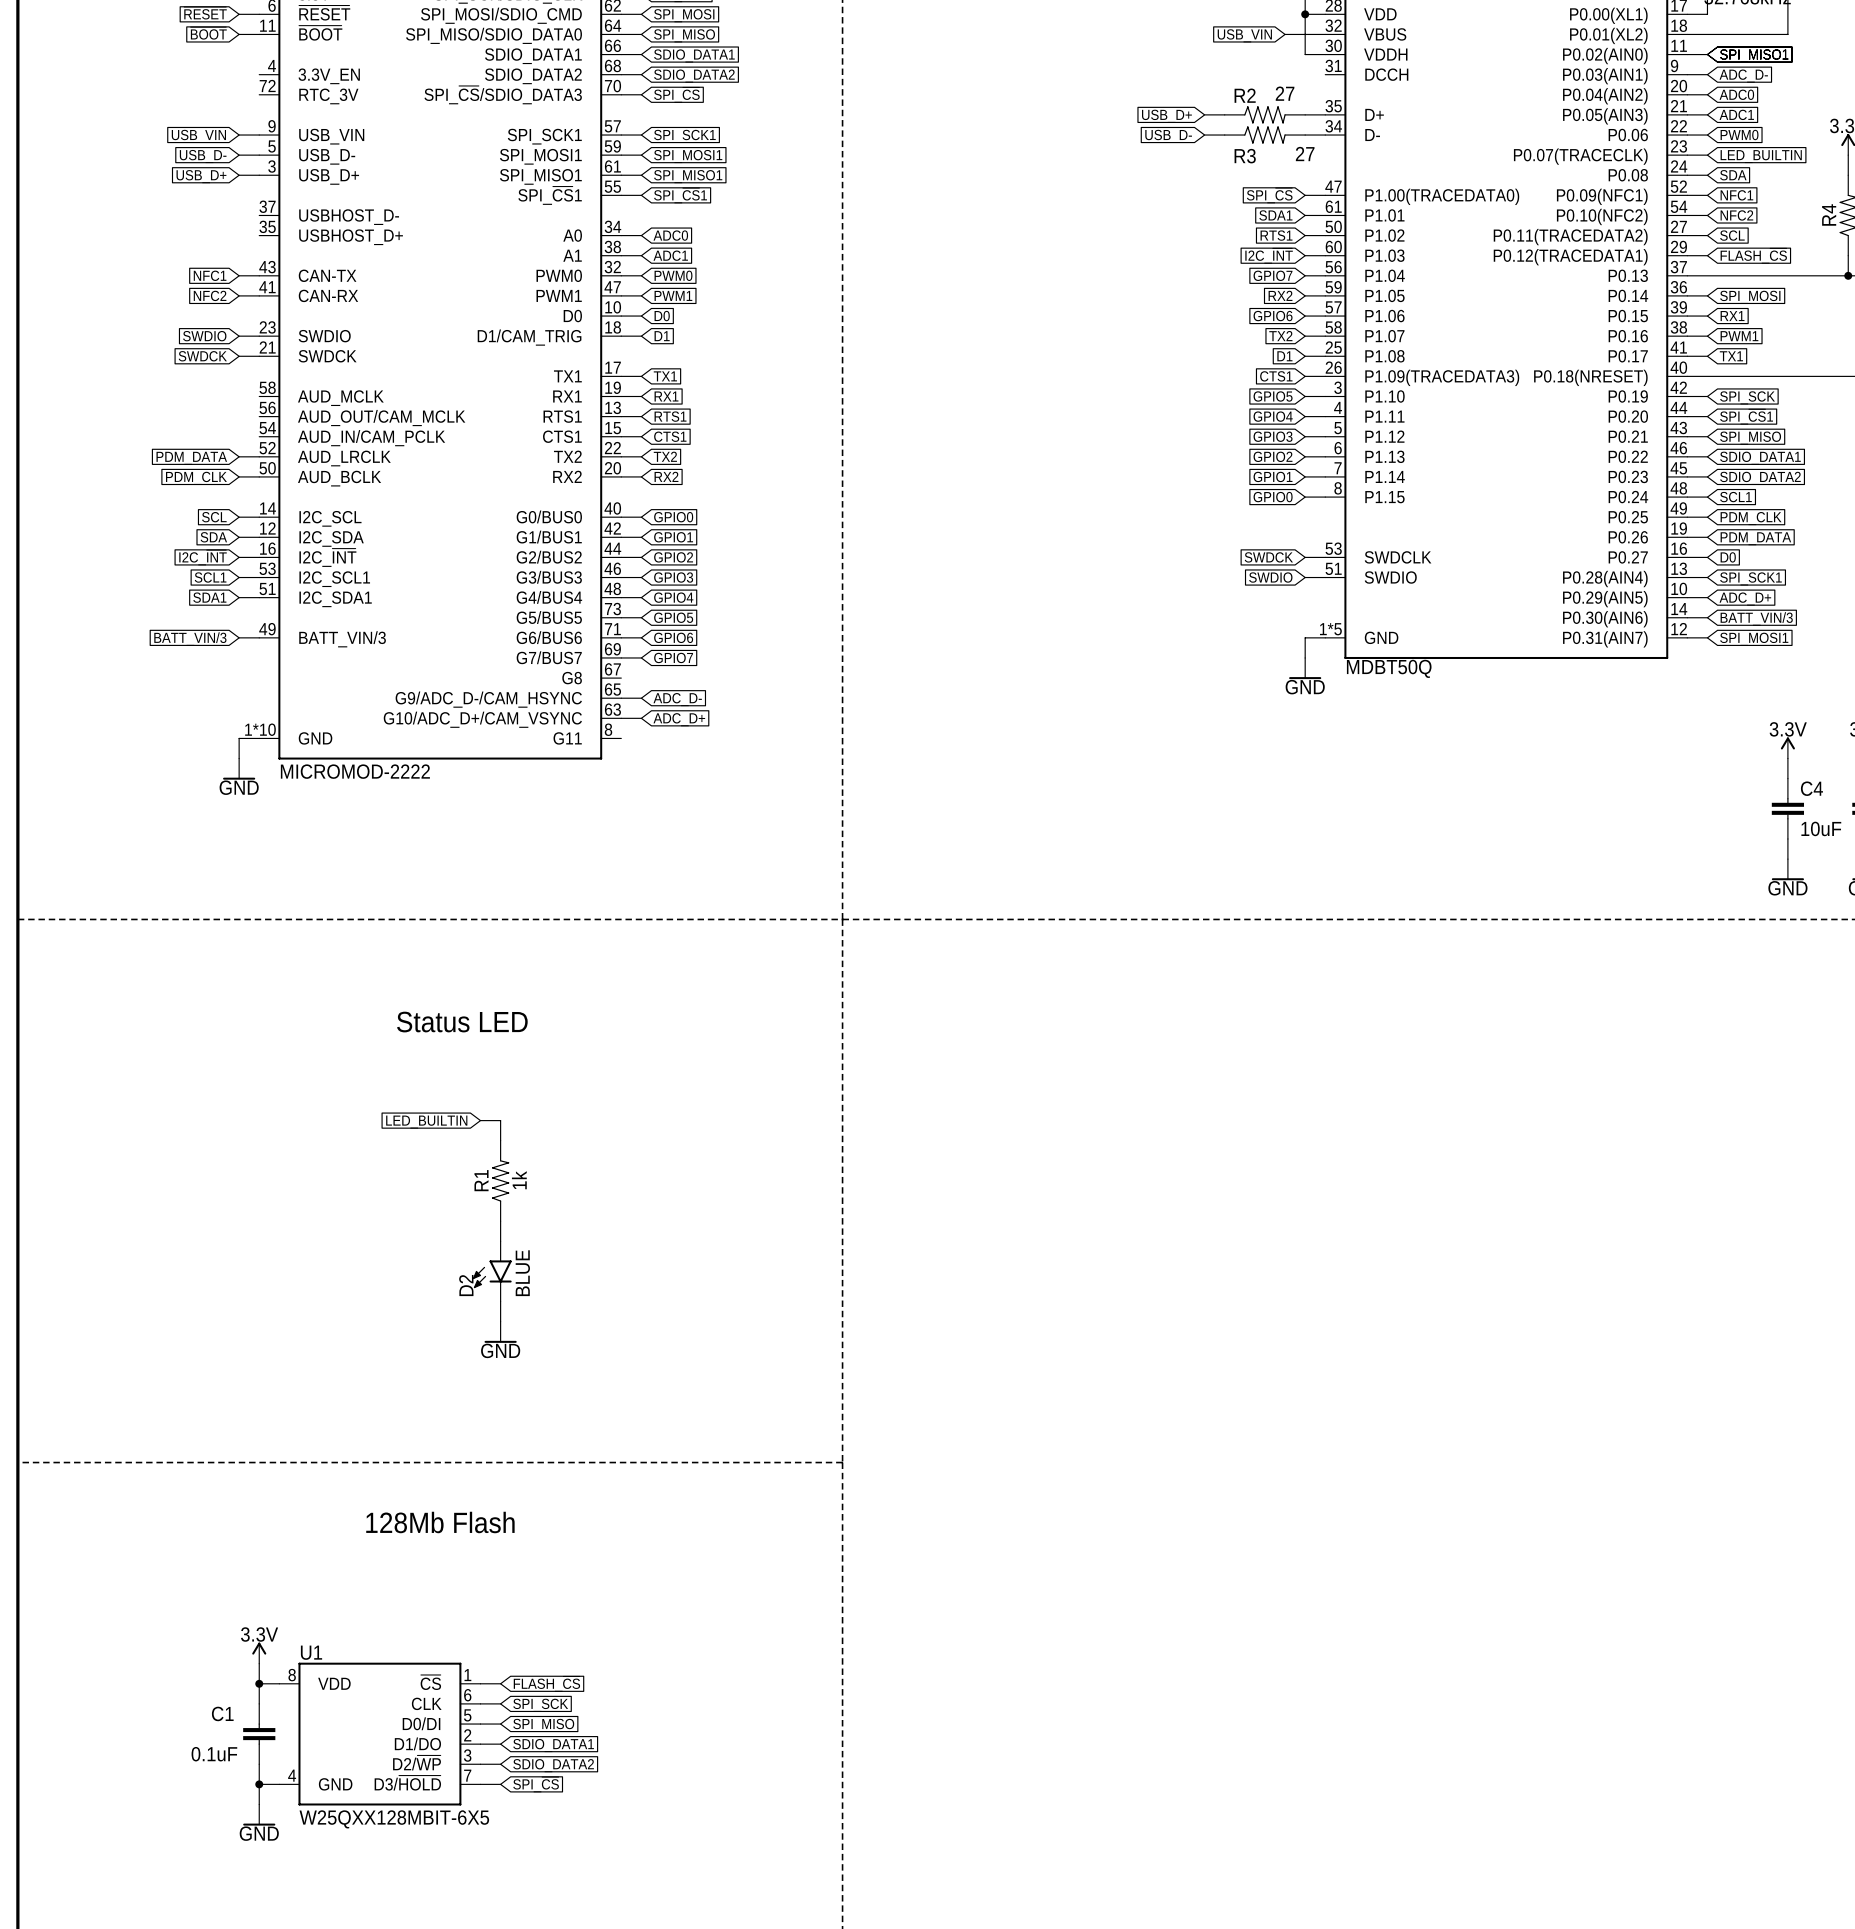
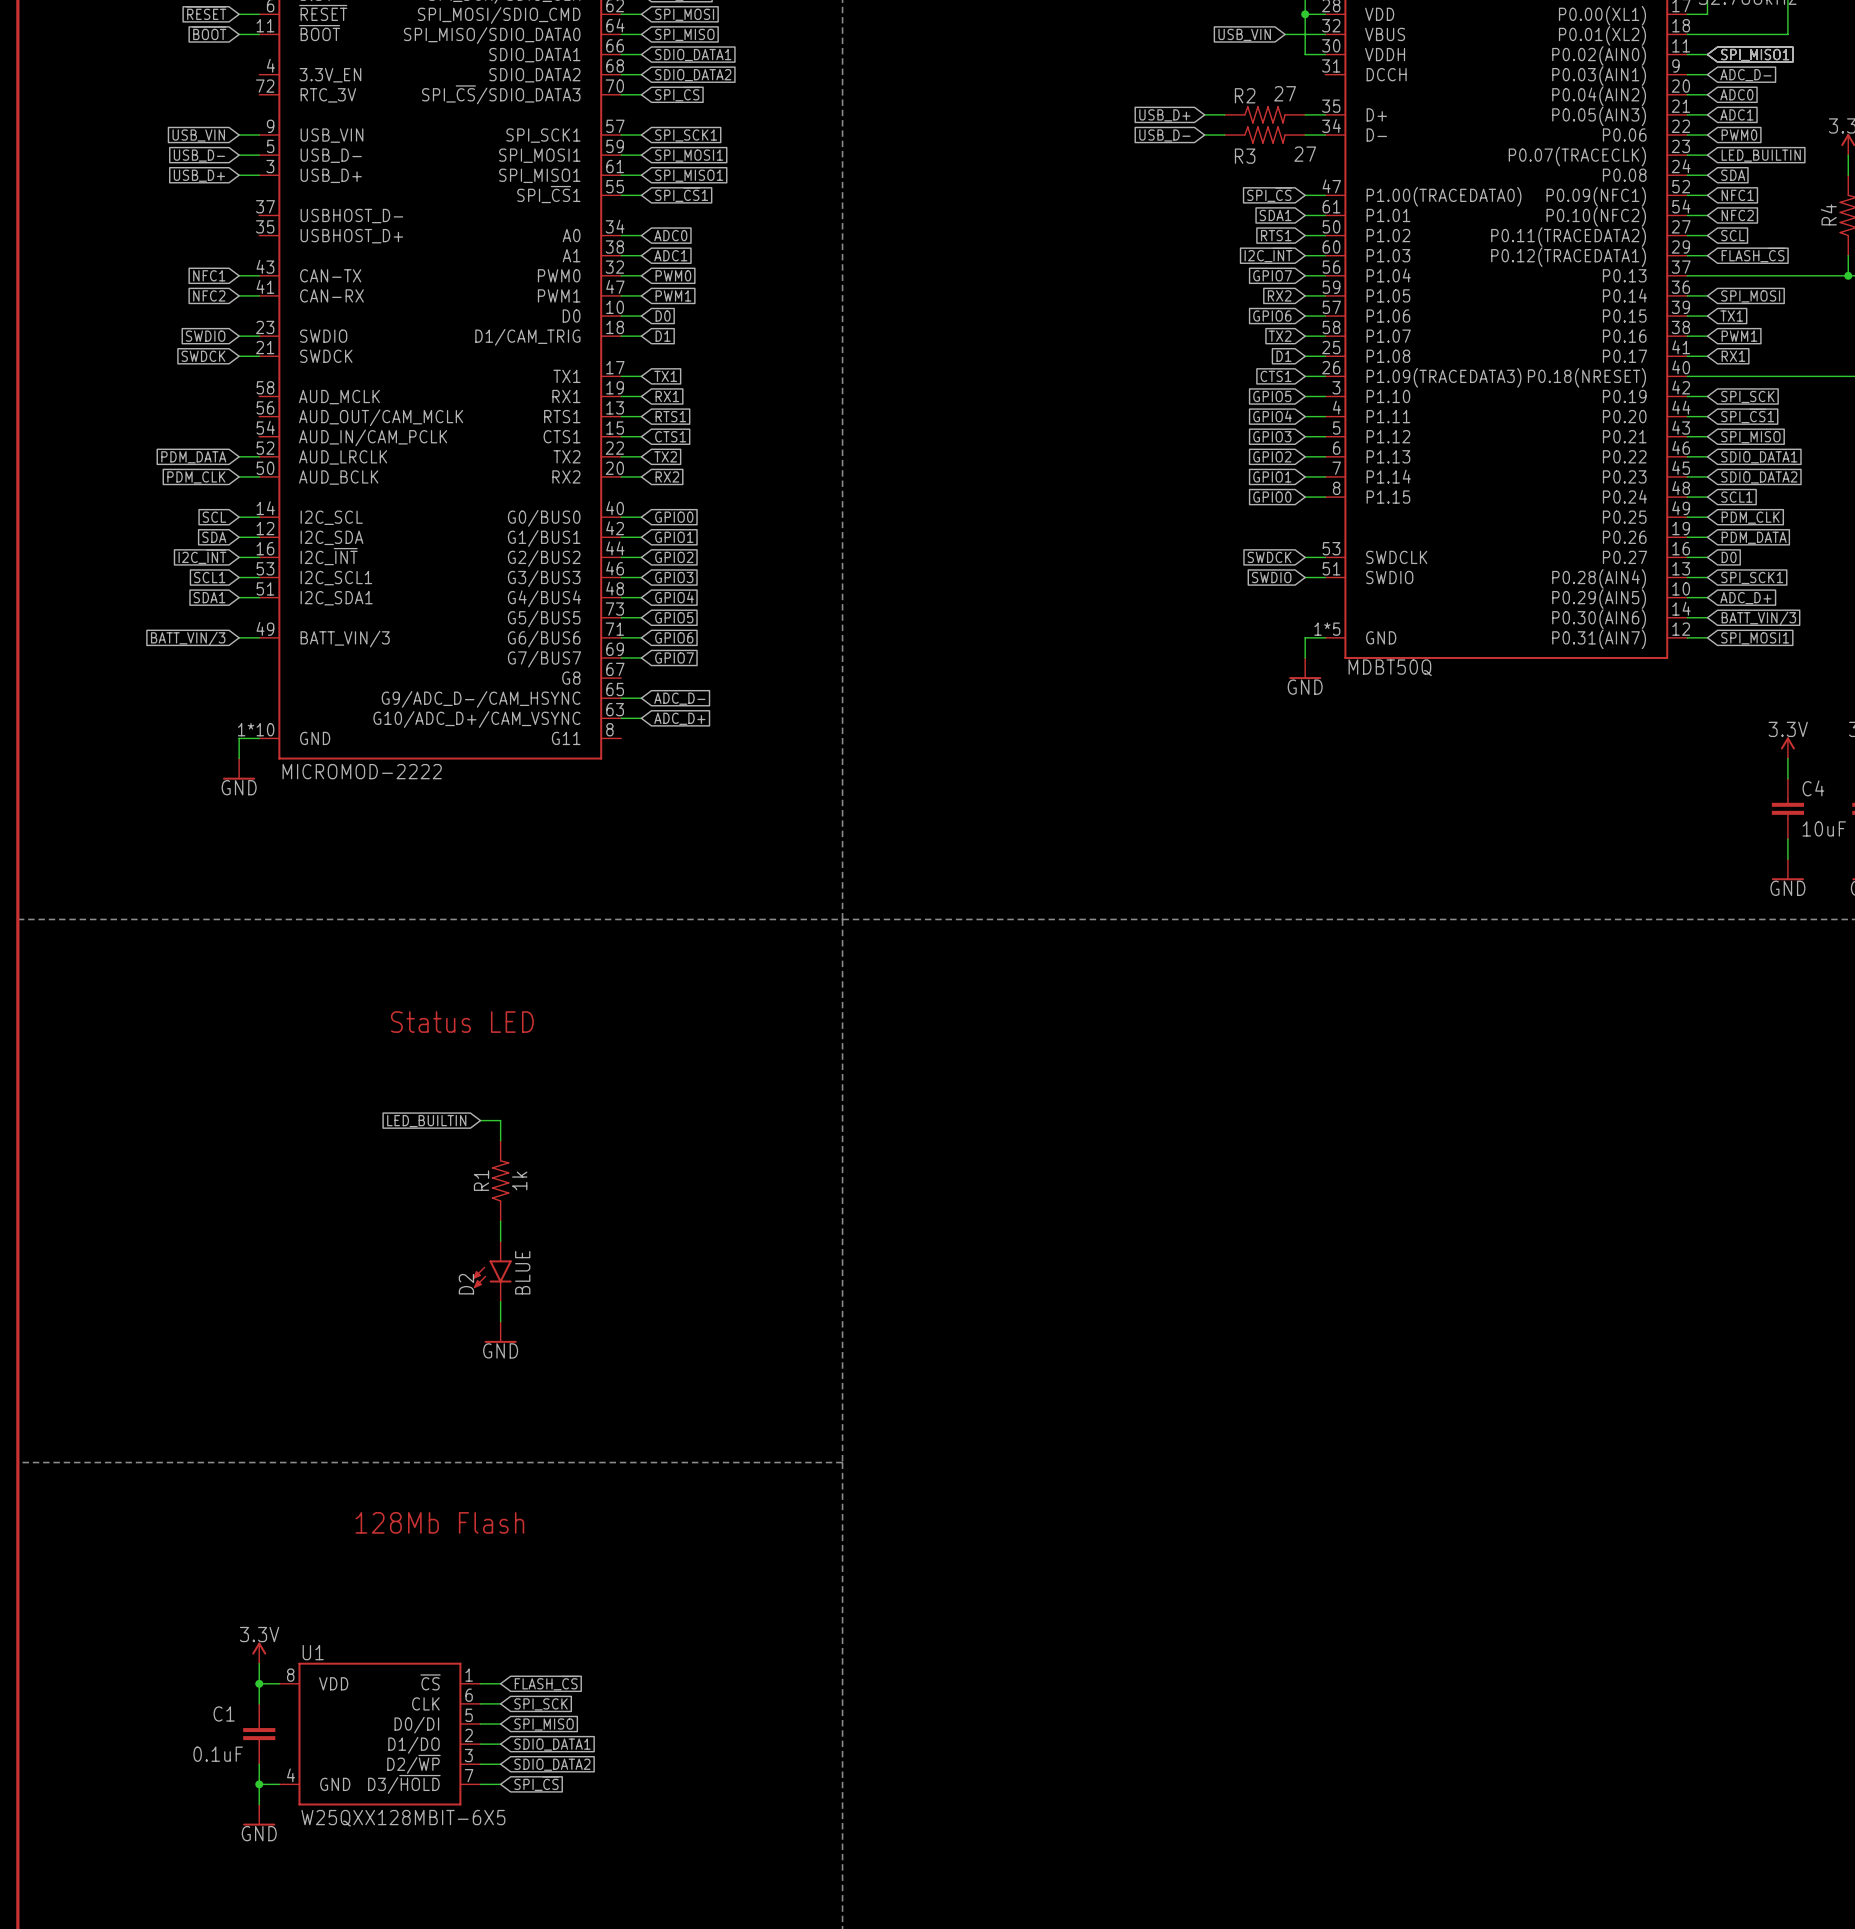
global label: RX1 (1732, 316) -> TX1 (1731, 316)
global label: TX1 (1731, 356) -> RX1 (1733, 356)

